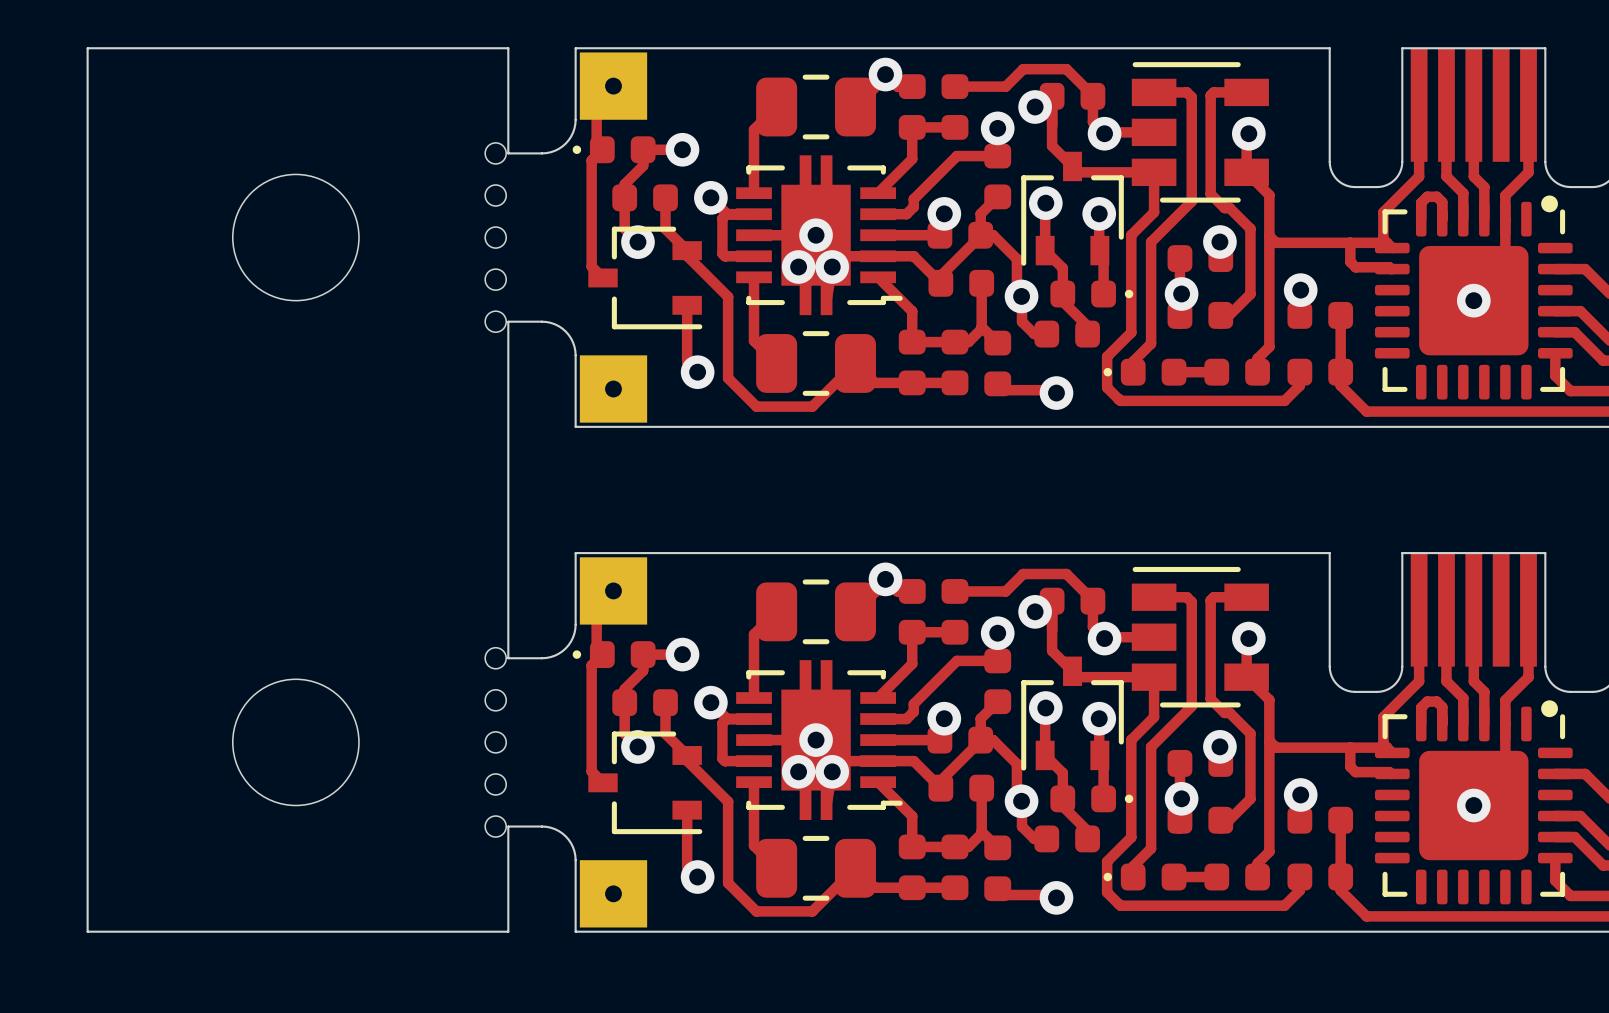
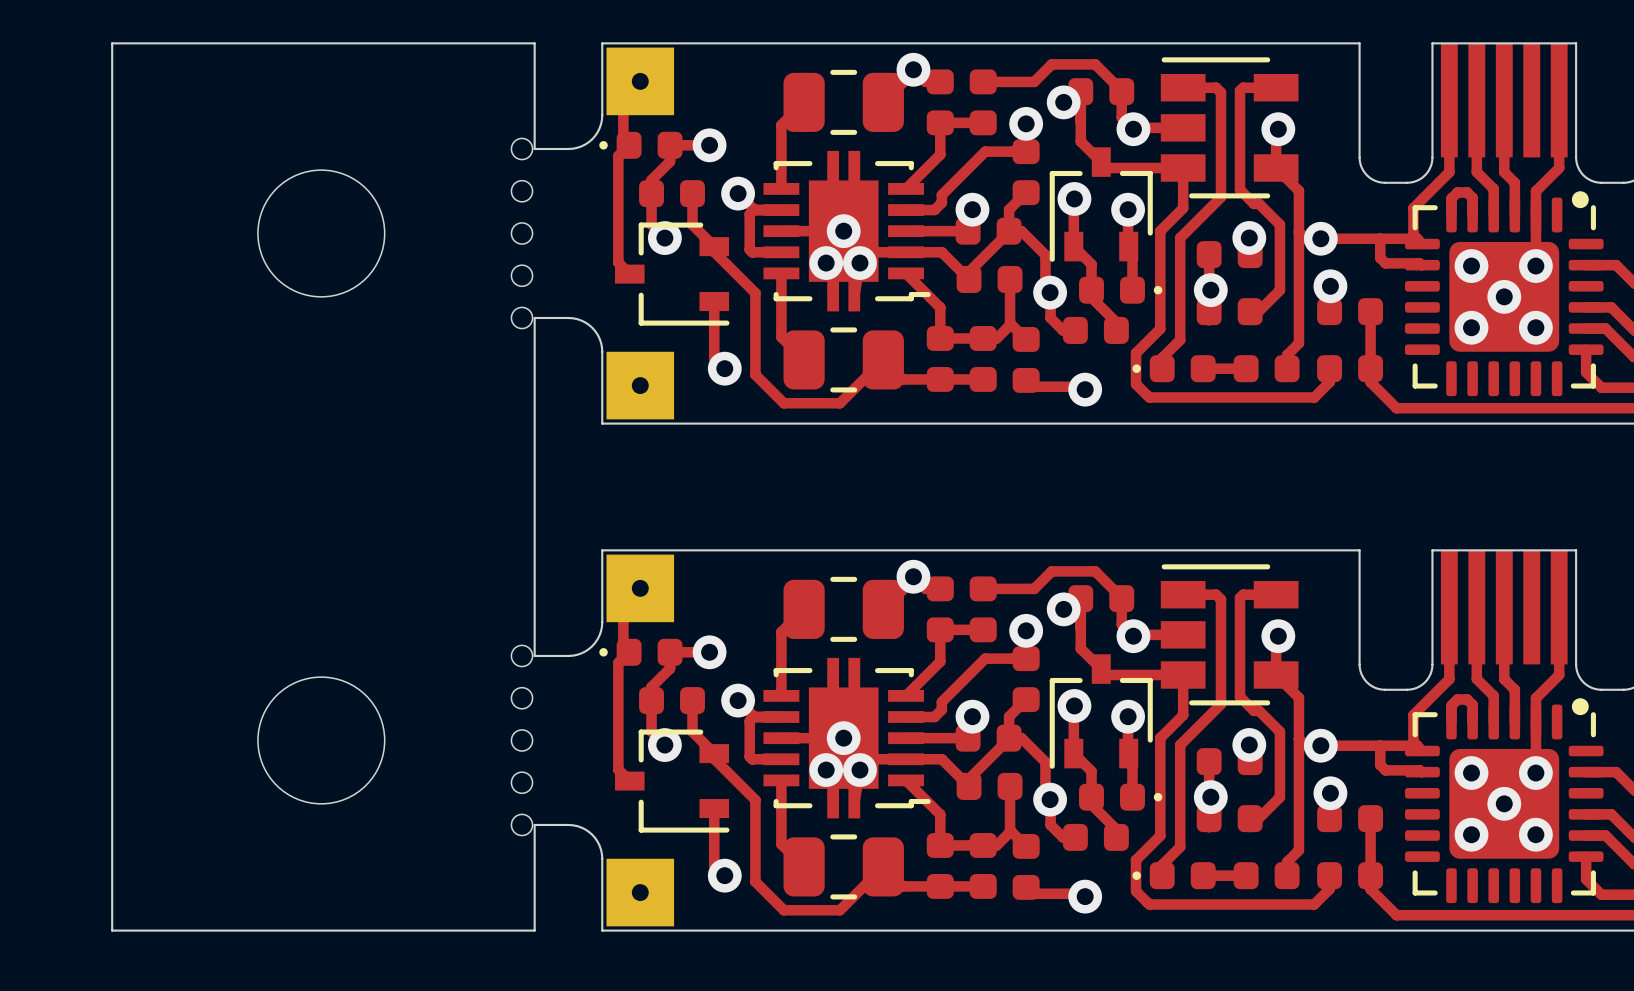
via: none -> (1320, 238)
via: none -> (1471, 266)
via: none -> (1535, 266)
via: none -> (1471, 327)
via: none -> (1535, 327)
via: none -> (1320, 745)
via: none -> (1471, 773)
via: none -> (1535, 773)
via: none -> (1471, 834)
via: none -> (1535, 834)

